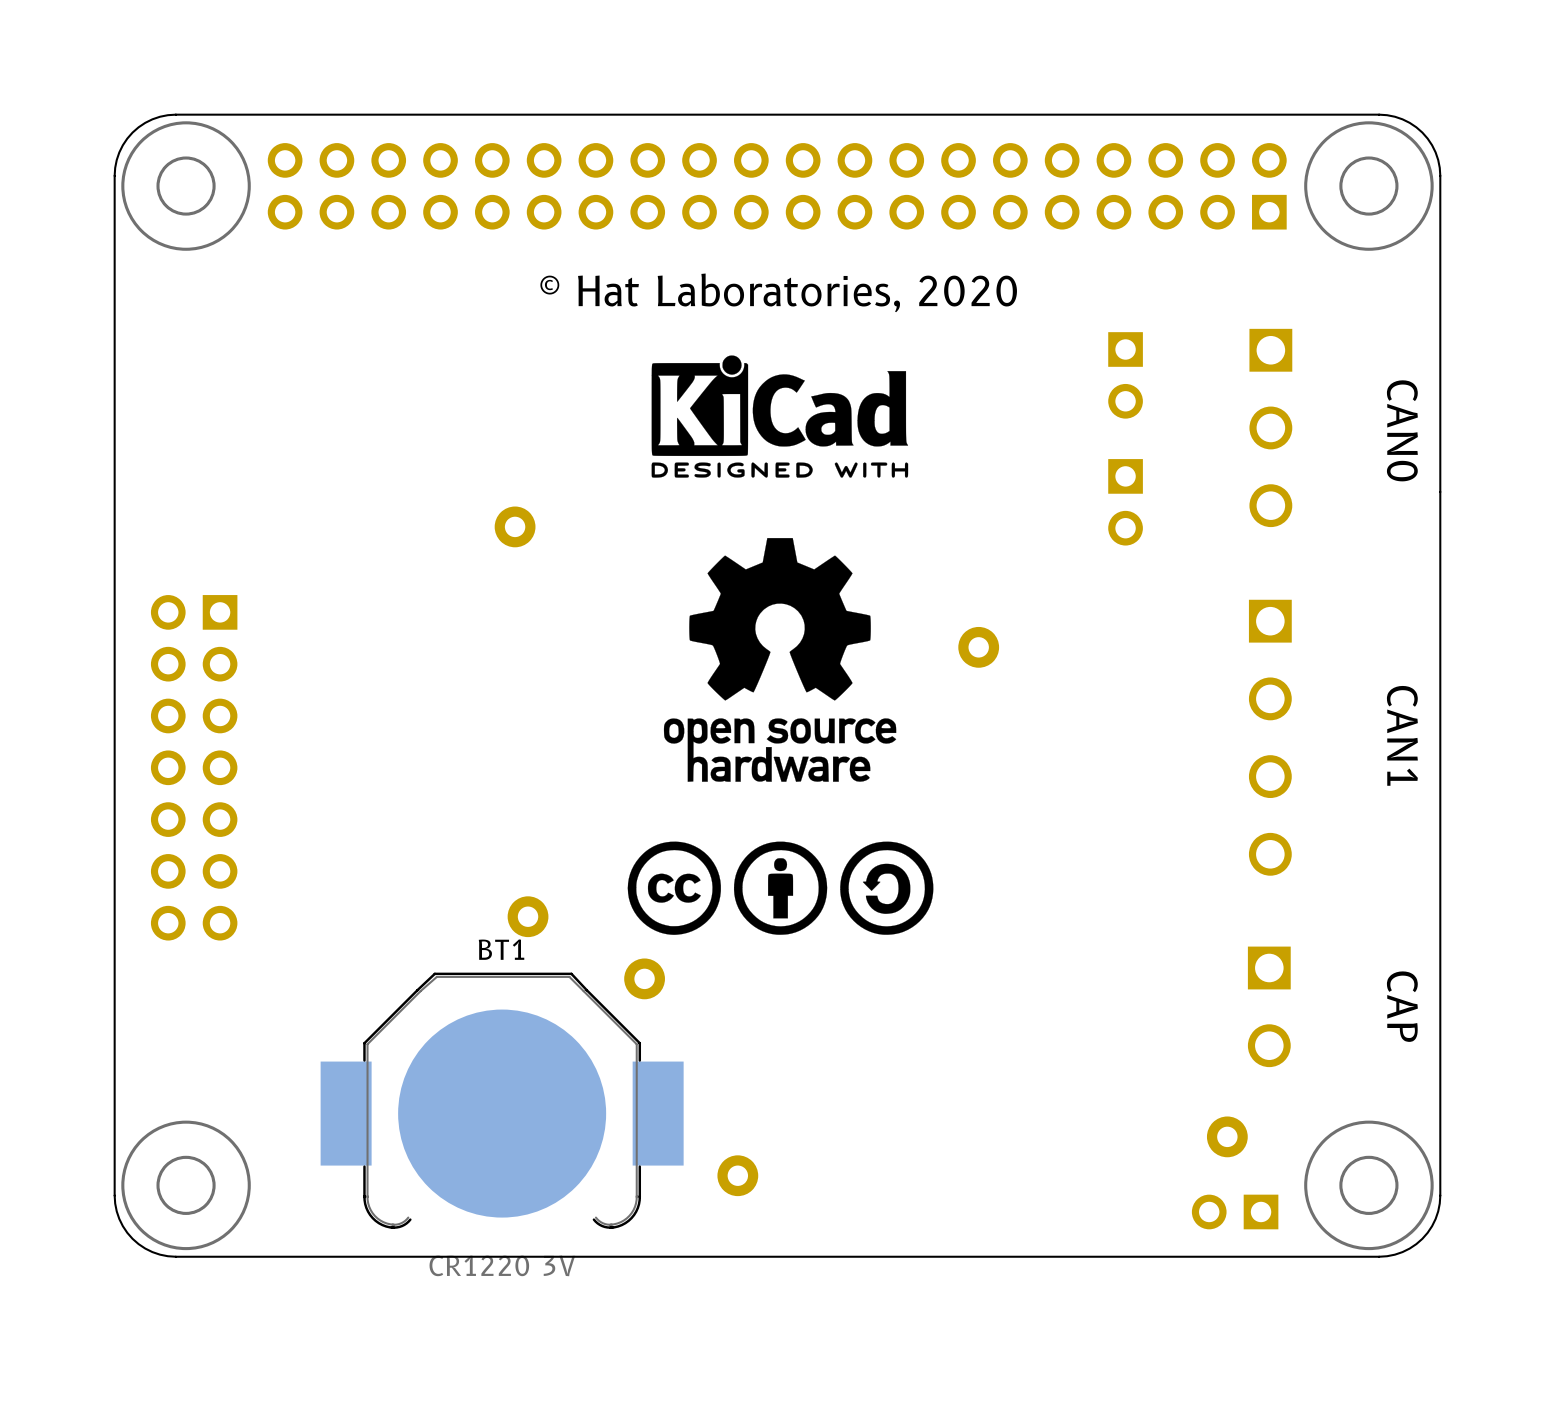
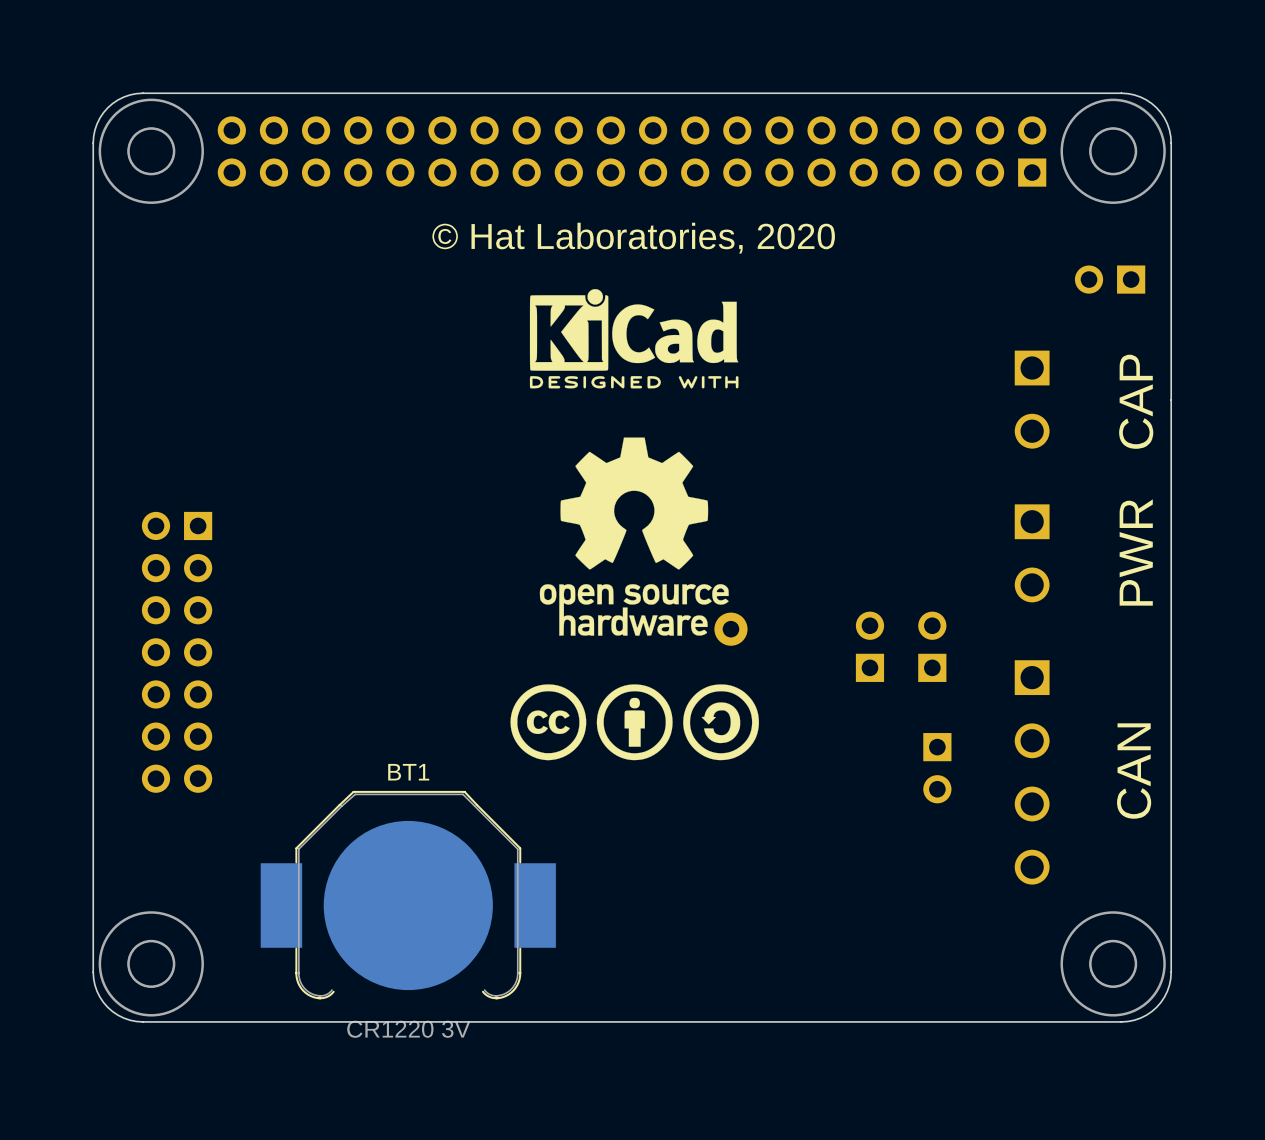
part: none -> (1110, 279)
part: (1125, 375) -> none
part: (1270, 427) -> none
text: CAN0 (1402, 430) -> none
part: none -> (1032, 399)
text: none -> CAP (1136, 401)
part: (1125, 502) -> none
part: (515, 526) -> none
part position: (978, 647) -> (730, 629)
text: none -> PWR (1136, 552)
part: none -> (1032, 553)
text: CAN1 (1402, 735) -> none
part position: (1270, 737) -> (1032, 772)
part position: (194, 767) -> (177, 652)
part: none -> (869, 646)
part: none -> (932, 646)
part: (528, 916) -> none
part: none -> (937, 768)
part: (644, 978) -> none
part: (1269, 1006) -> none
text: CAP (1402, 1006) -> CAN (1134, 771)
part: (1227, 1136) -> none
part: (737, 1175) -> none
part: (1235, 1211) -> none

